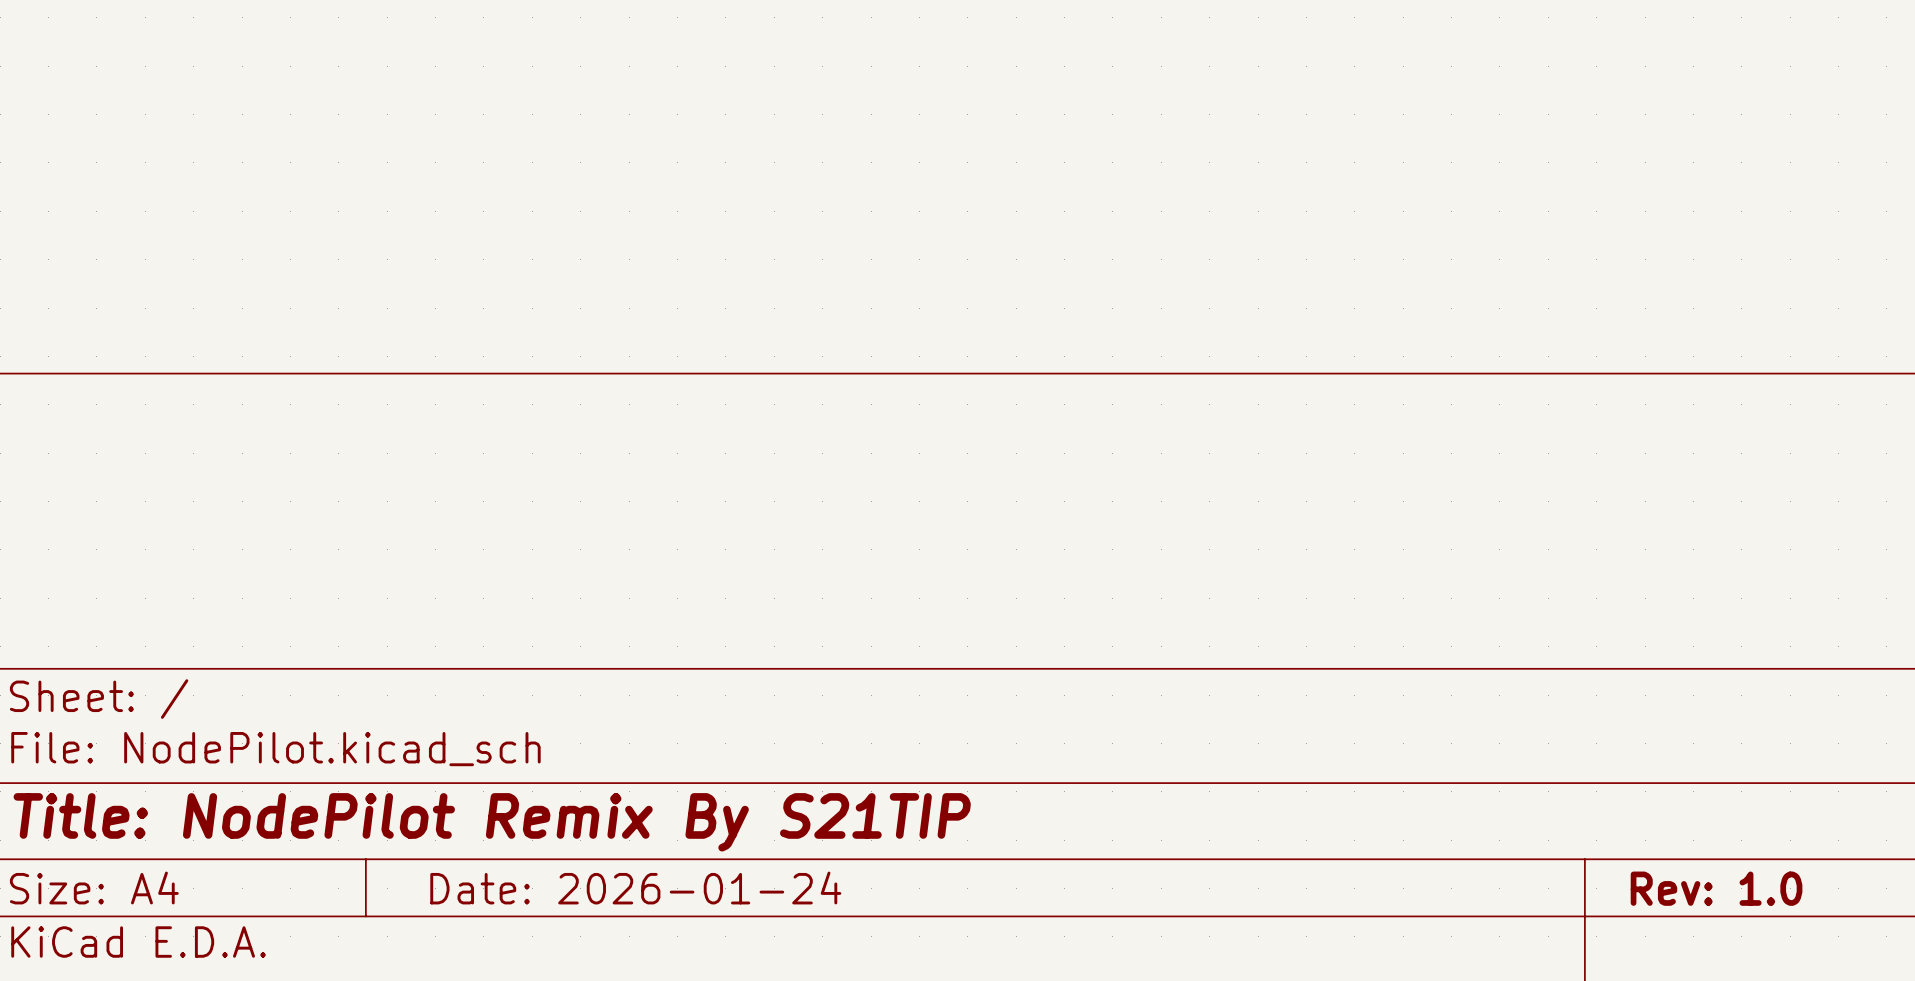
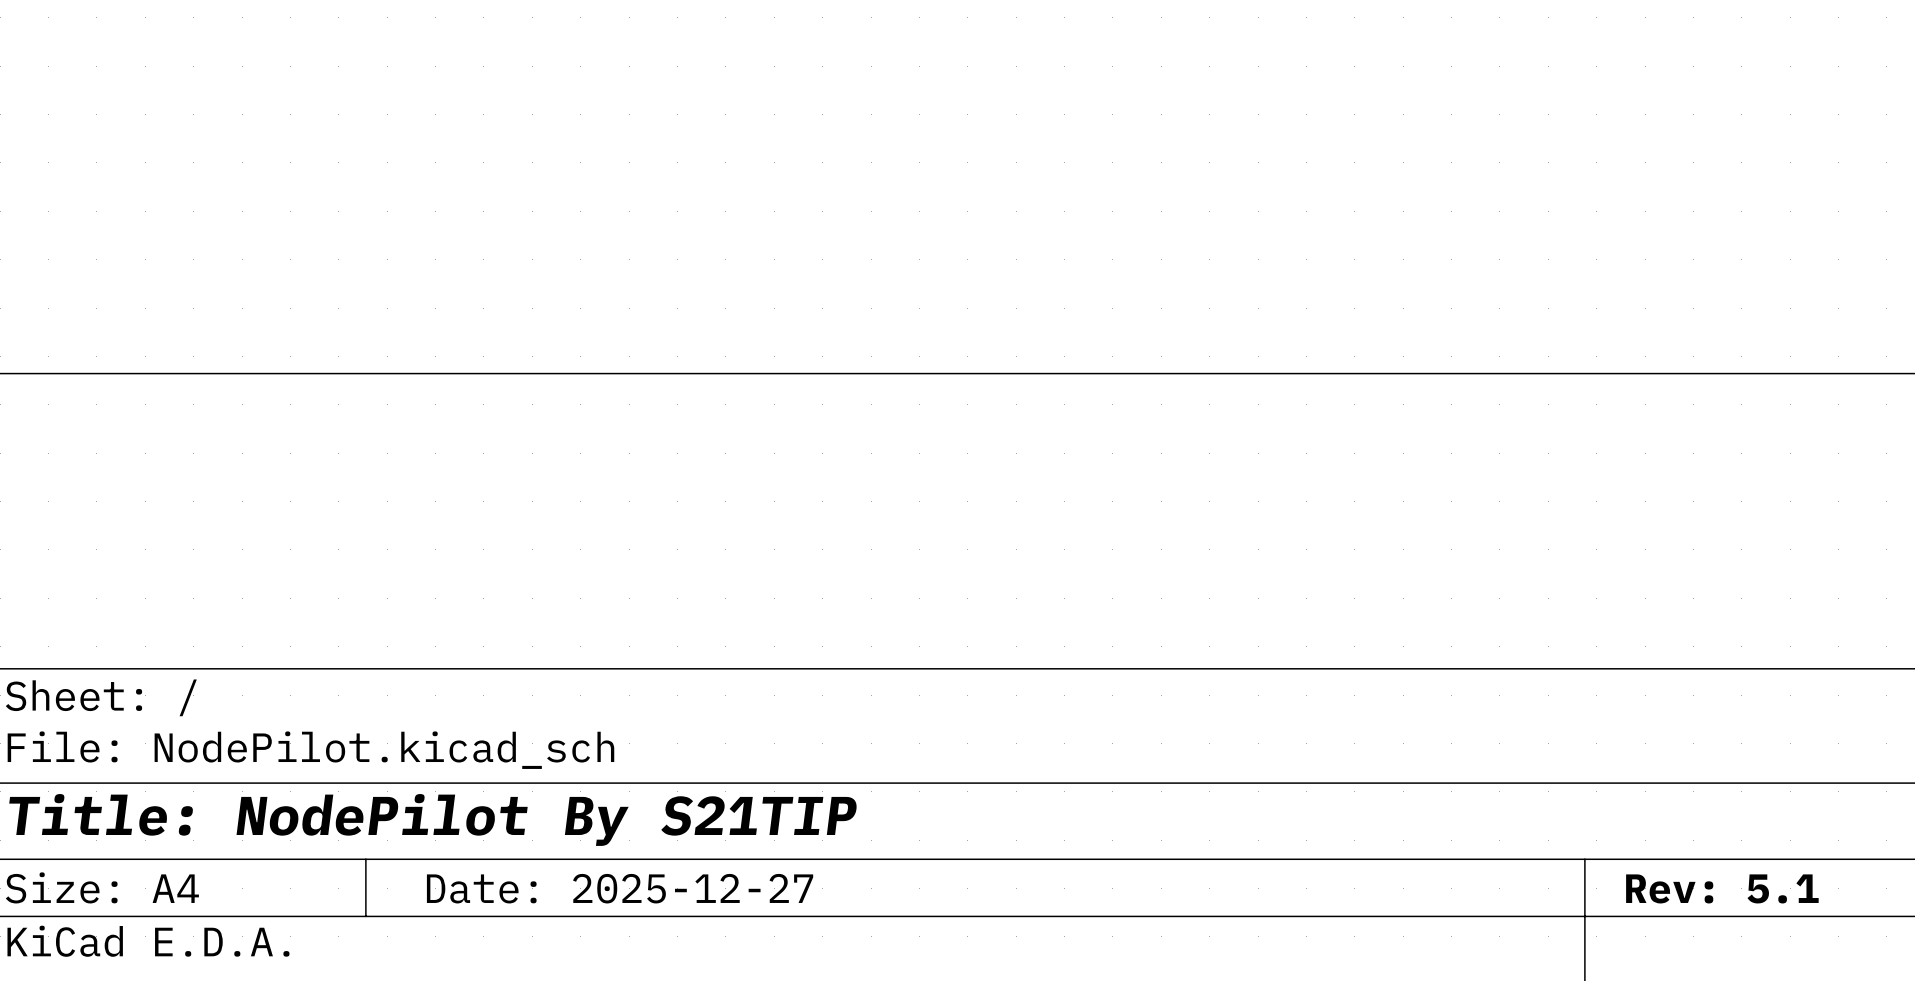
title block: Title: NodePilot Remix By S21TIP (492, 822) -> Title: NodePilot By S21TIP (433, 819)
title block: Date: 2026-01-24 (635, 888) -> Date: 2025-12-27 (620, 888)
title block: Rev: 1.0 (1716, 888) -> Rev: 5.1 (1722, 888)

